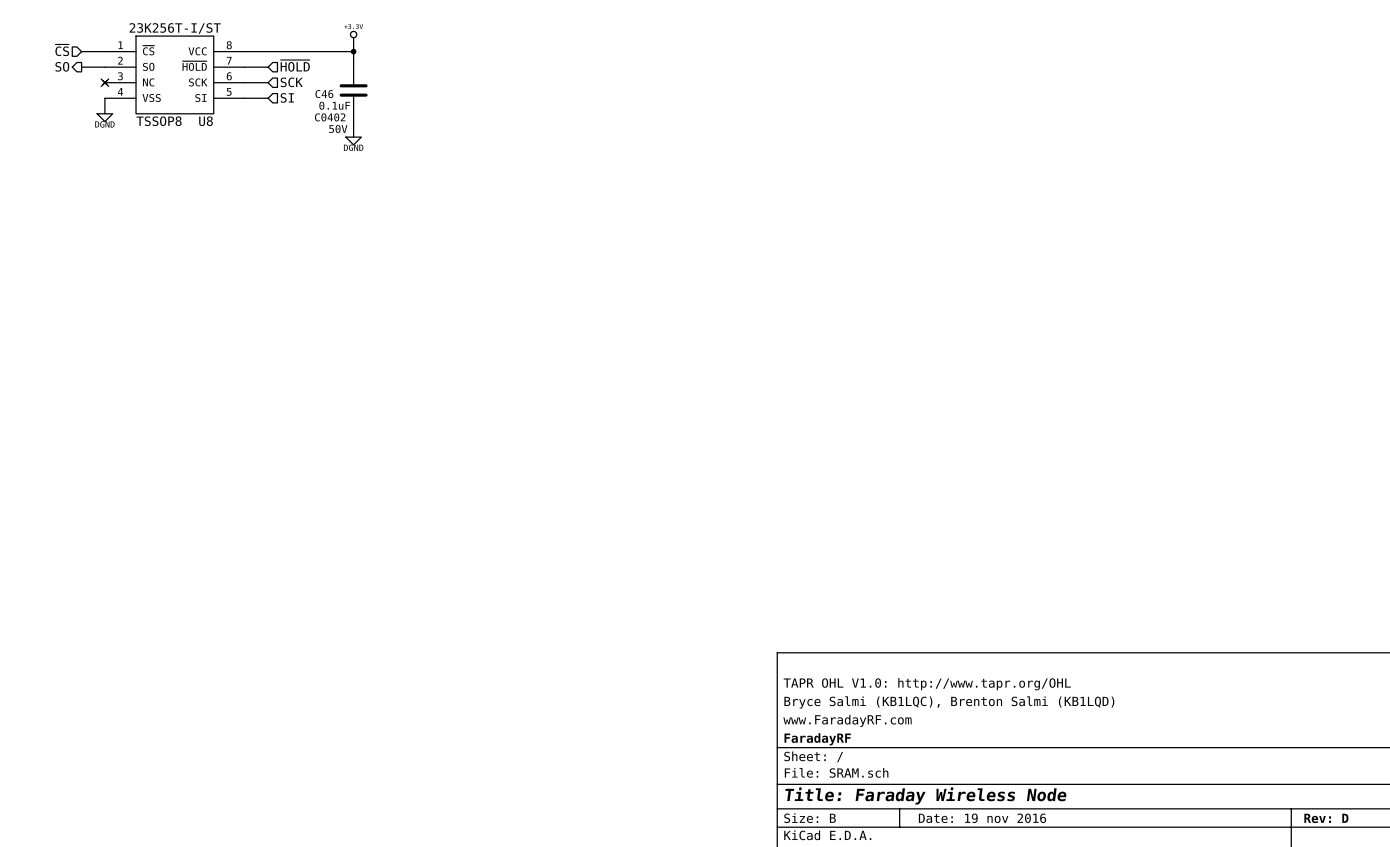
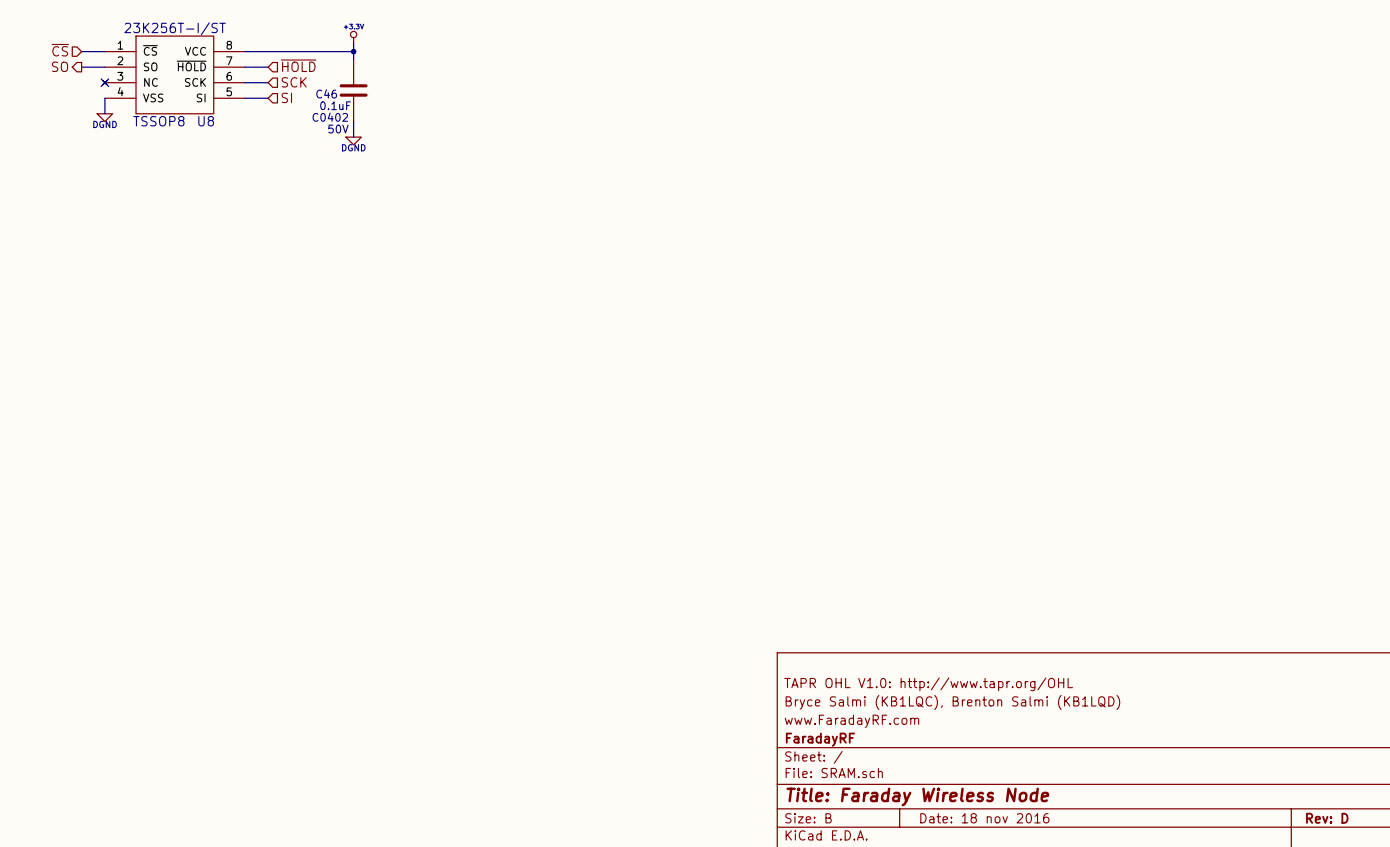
title block: Date: 19 nov 2016 (982, 818) -> Date: 18 nov 2016 (984, 818)

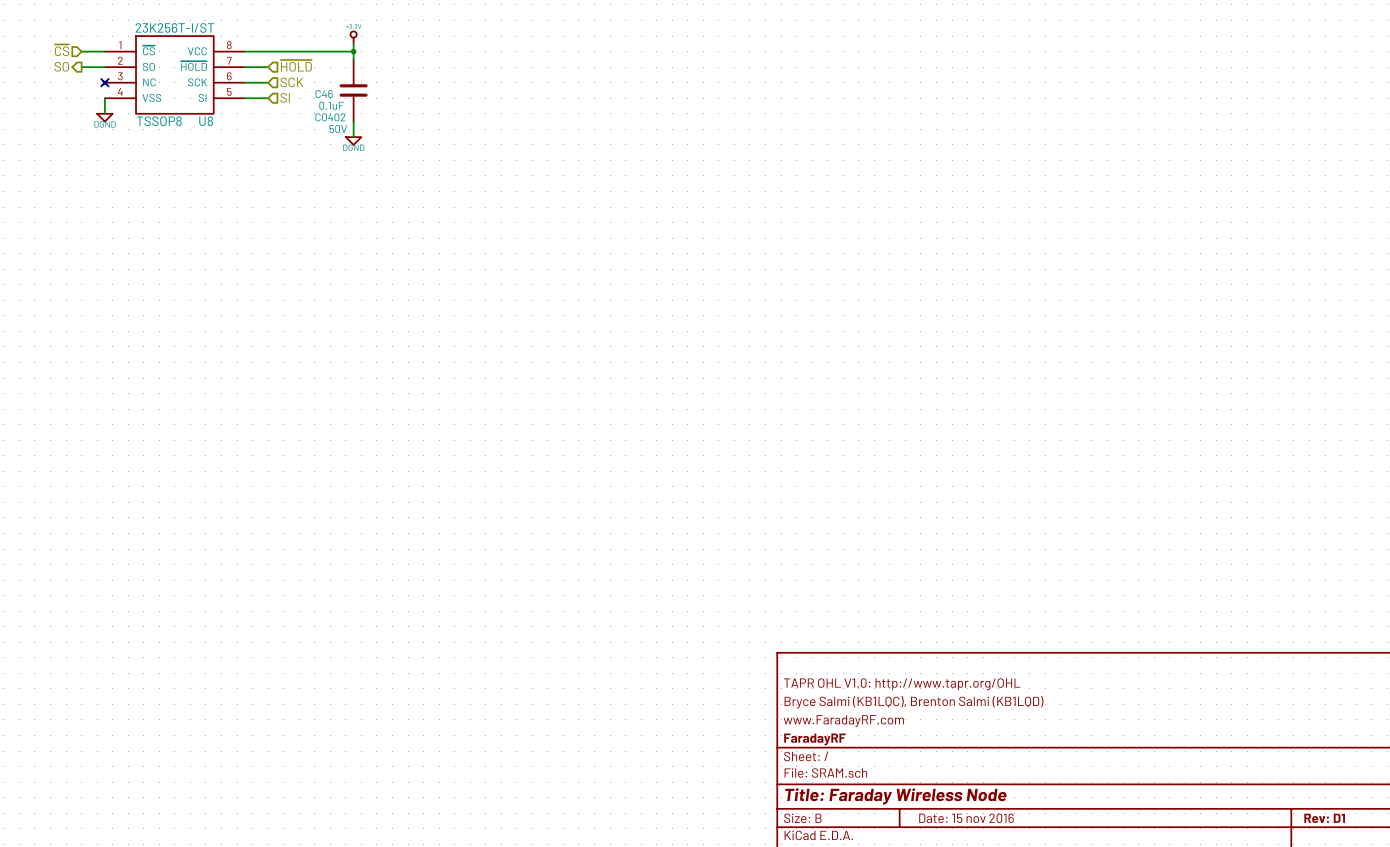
title block: Date: 18 nov 2016 (984, 818) -> Date: 15 nov 2016 (966, 818)
title block: Rev: D (1327, 818) -> Rev: D1 (1324, 818)

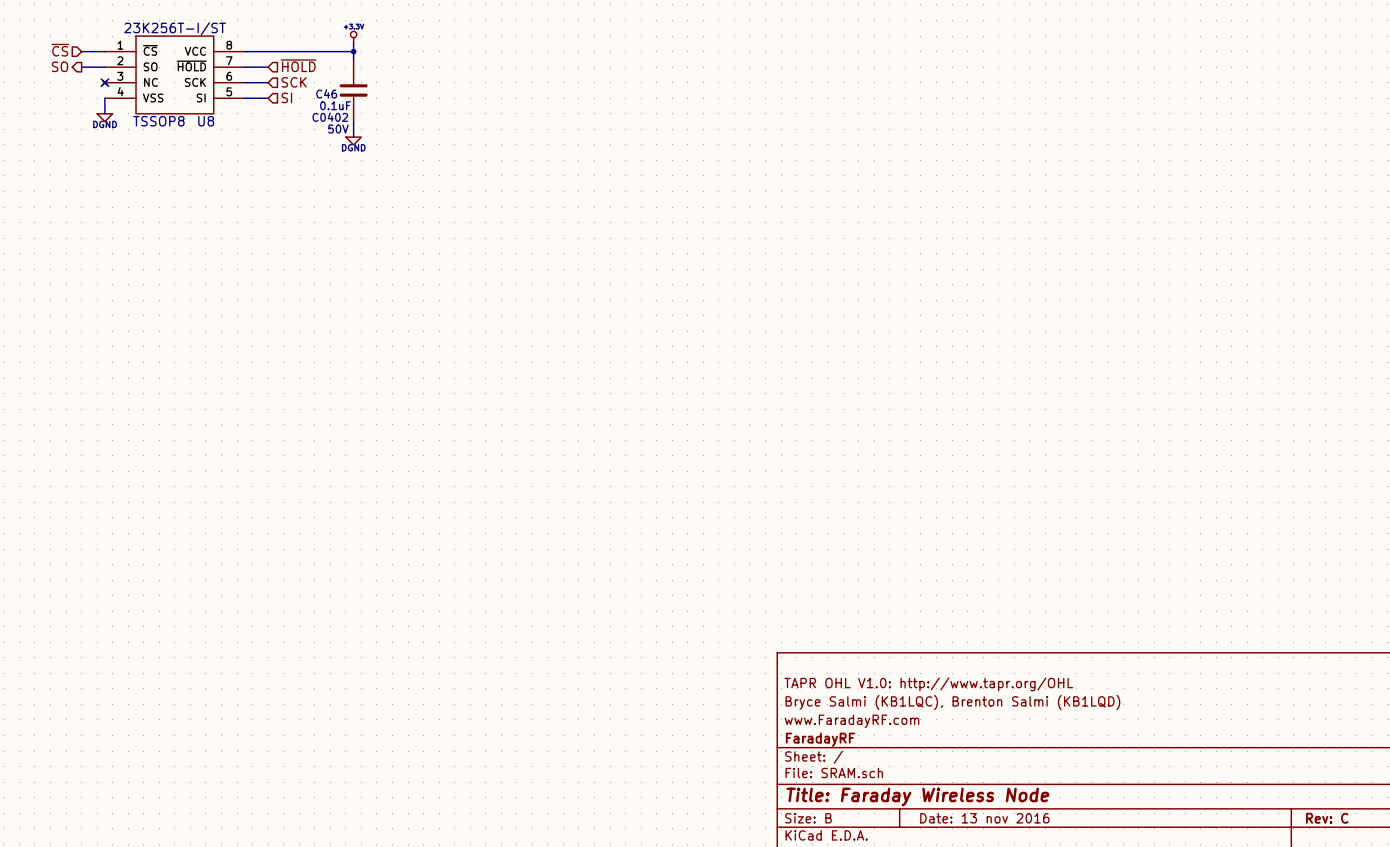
title block: Date: 15 nov 2016 (966, 818) -> Date: 13 nov 2016 (984, 818)
title block: Rev: D1 (1324, 818) -> Rev: C (1327, 818)

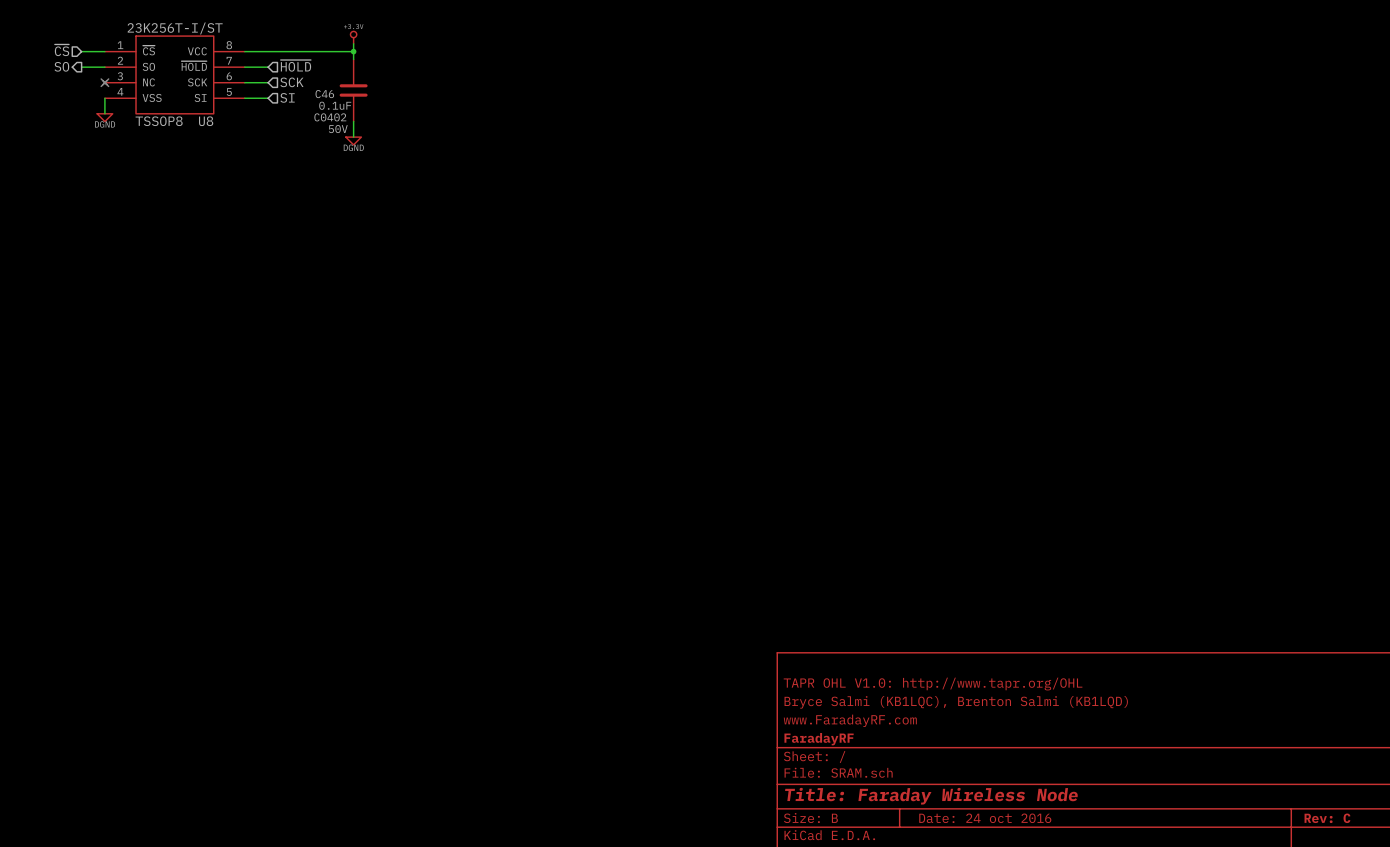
title block: Date: 13 nov 2016 (984, 818) -> Date: 24 oct 2016 (985, 818)

